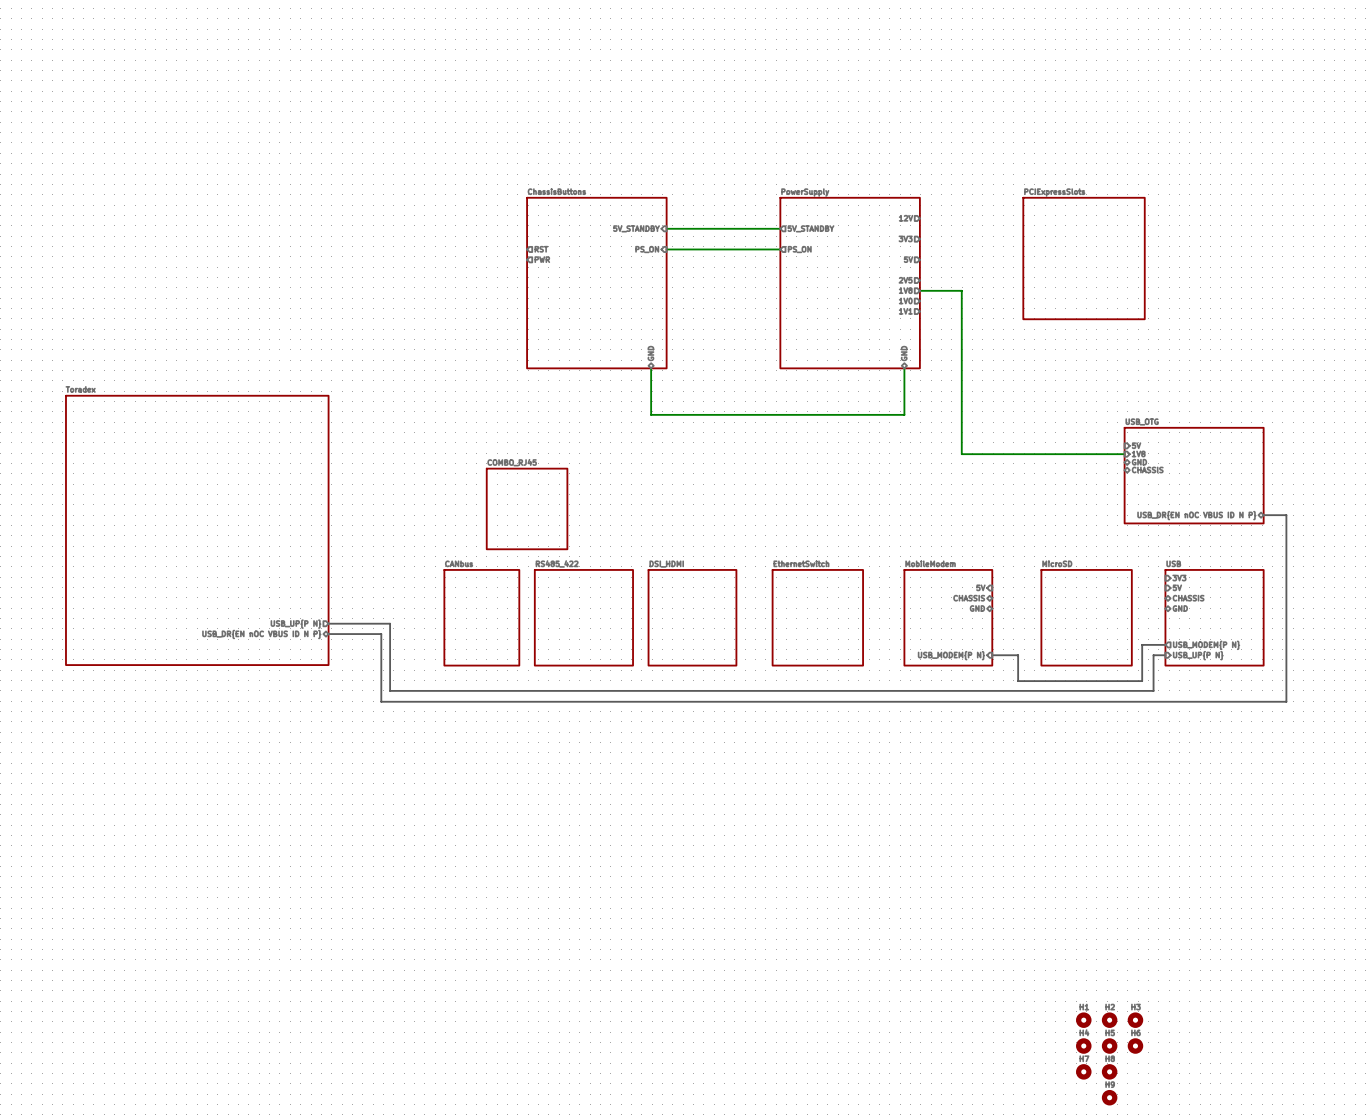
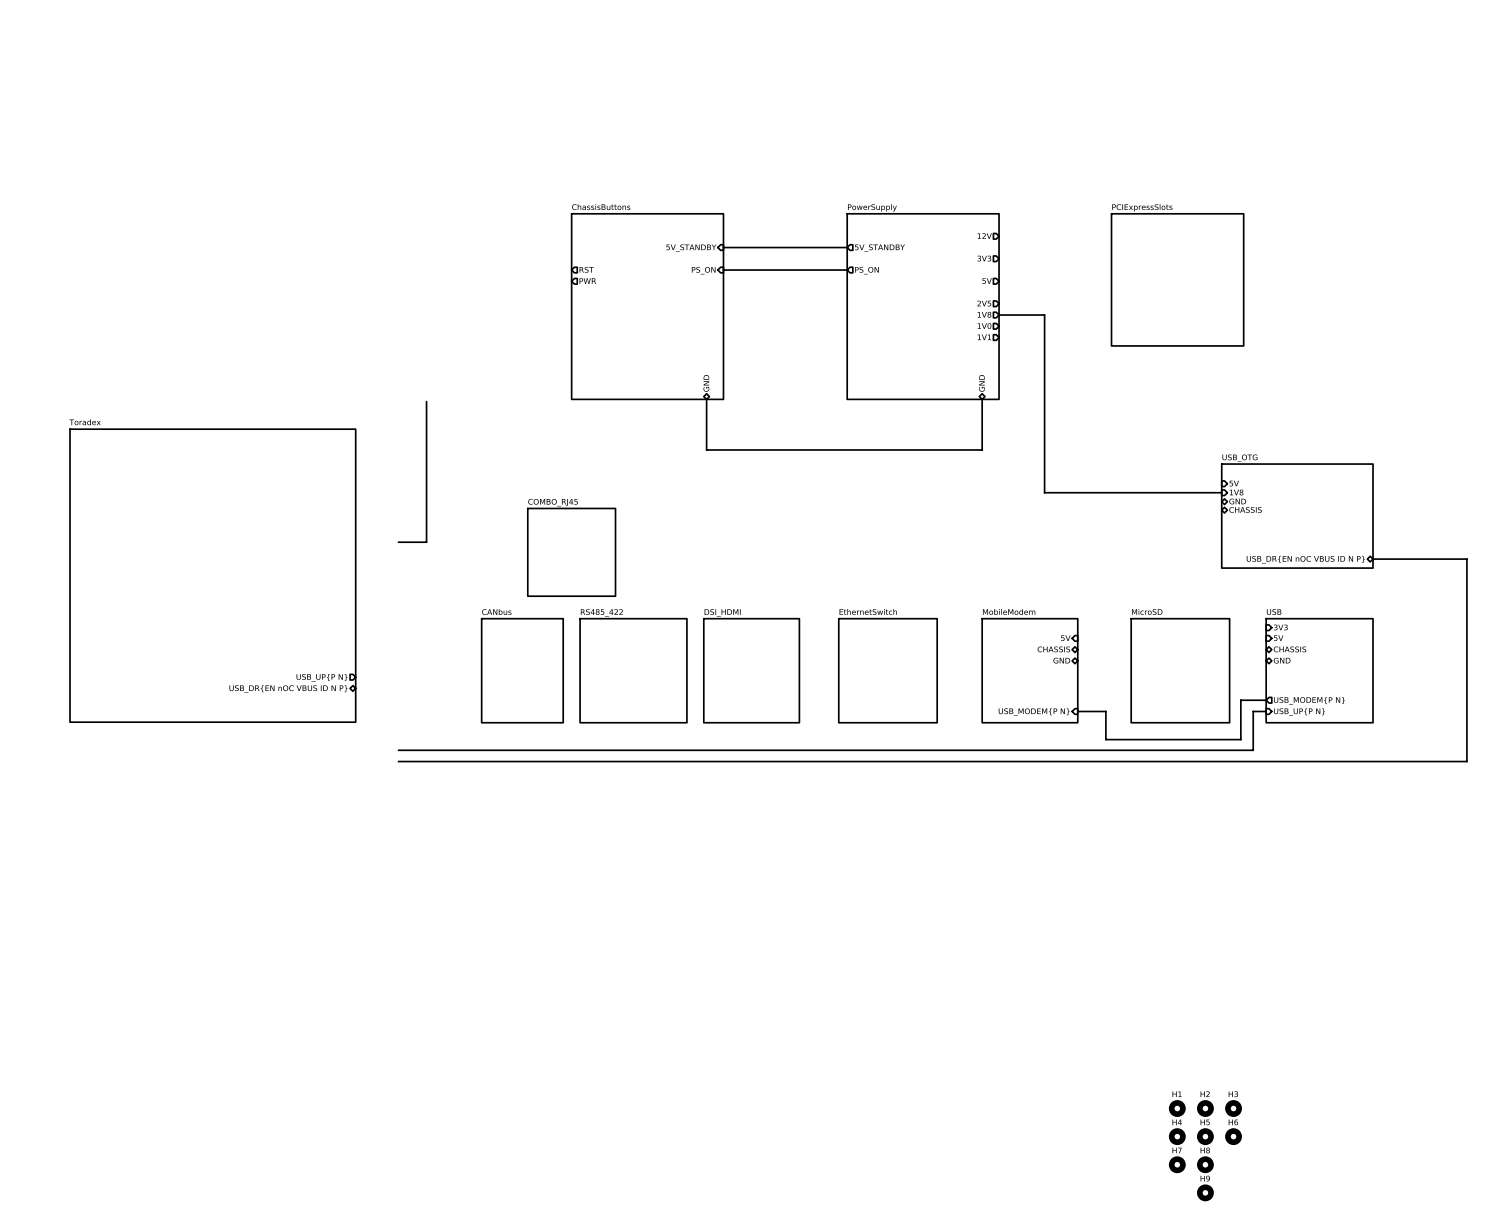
bus: none -> (426, 401) (426, 542) (398, 542)
bus: (1286, 515) (1286, 701) (381, 701) (381, 634) (328, 634) -> (1397, 559) (1466, 559) (1466, 761) (398, 761)
bus: (328, 623) (390, 623) (390, 690) -> (398, 750) (422, 750)

